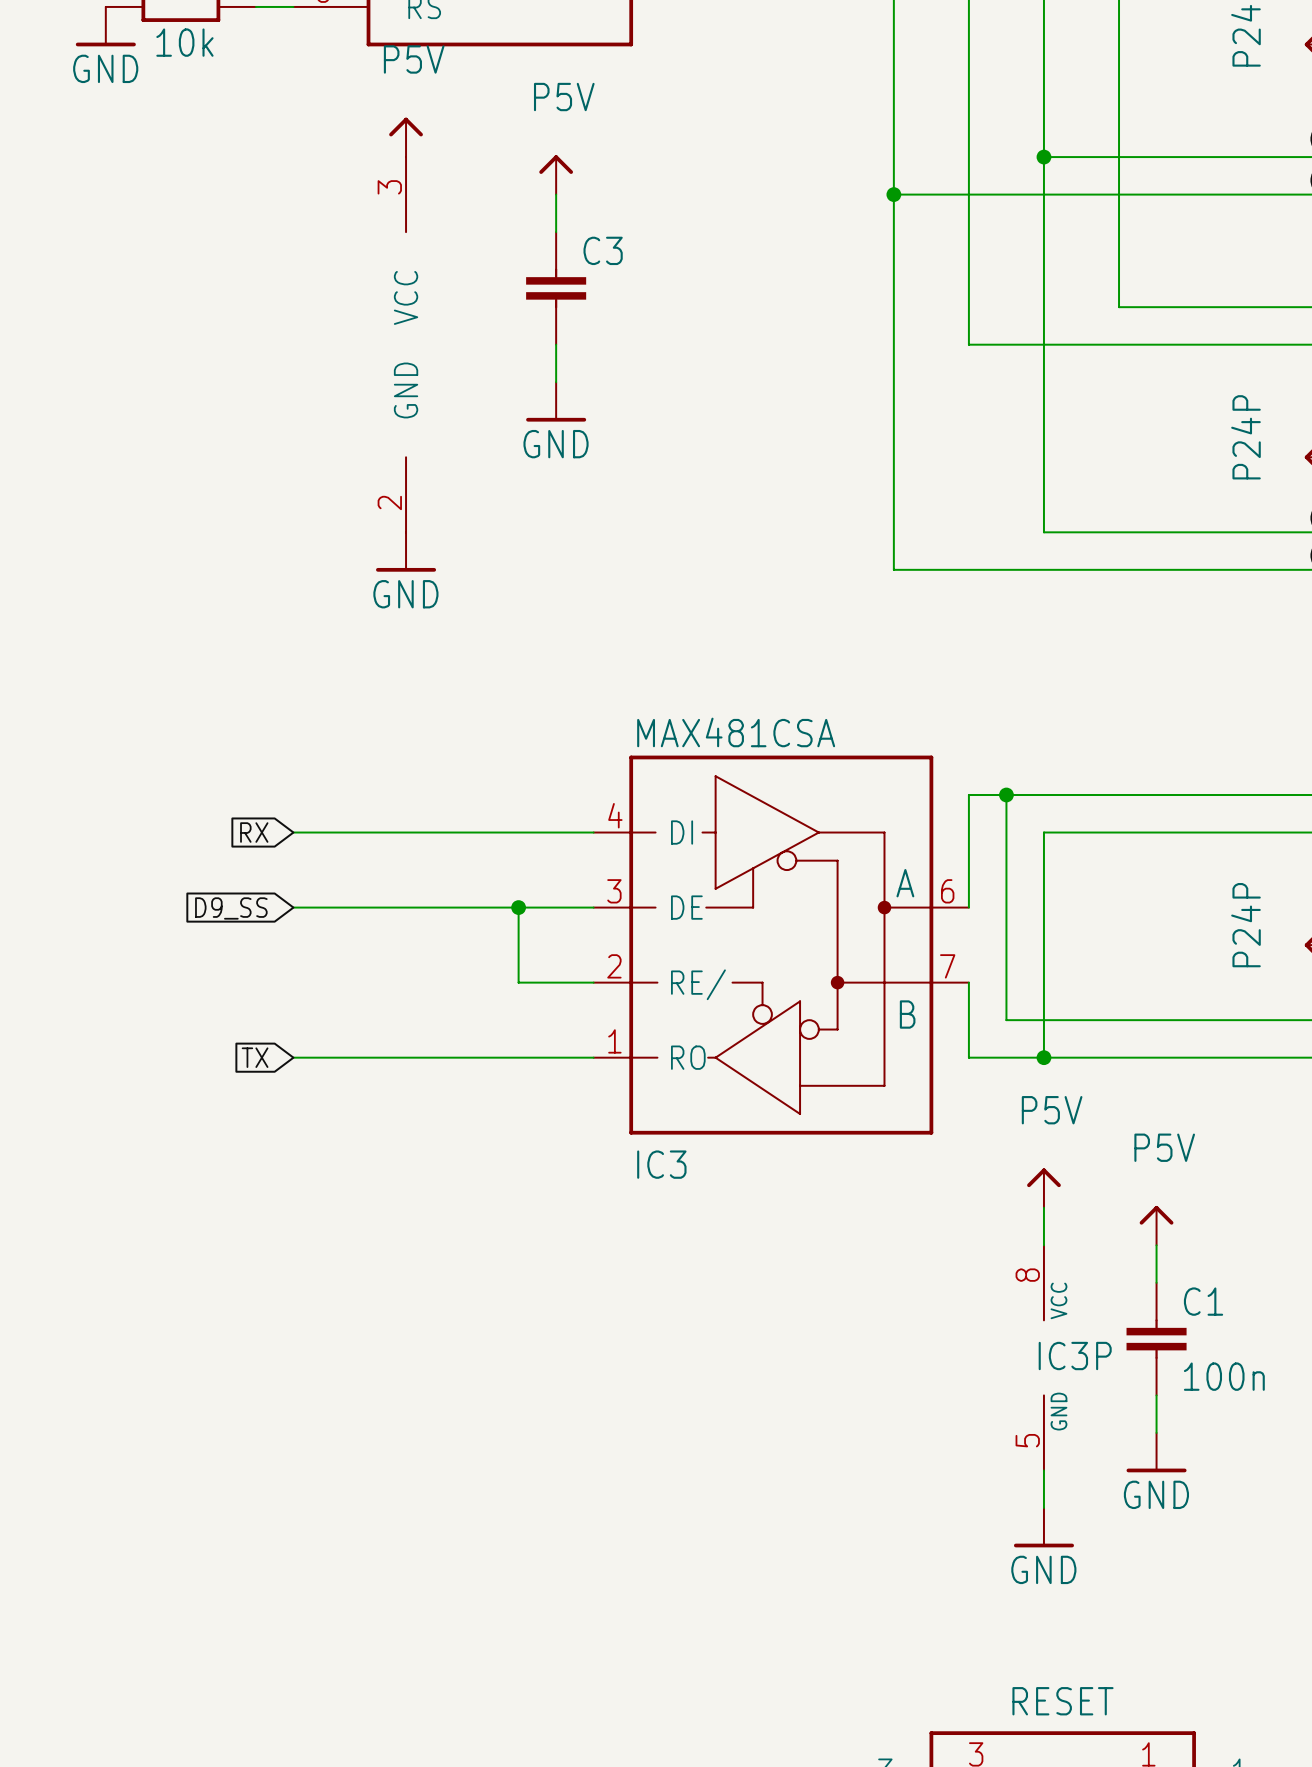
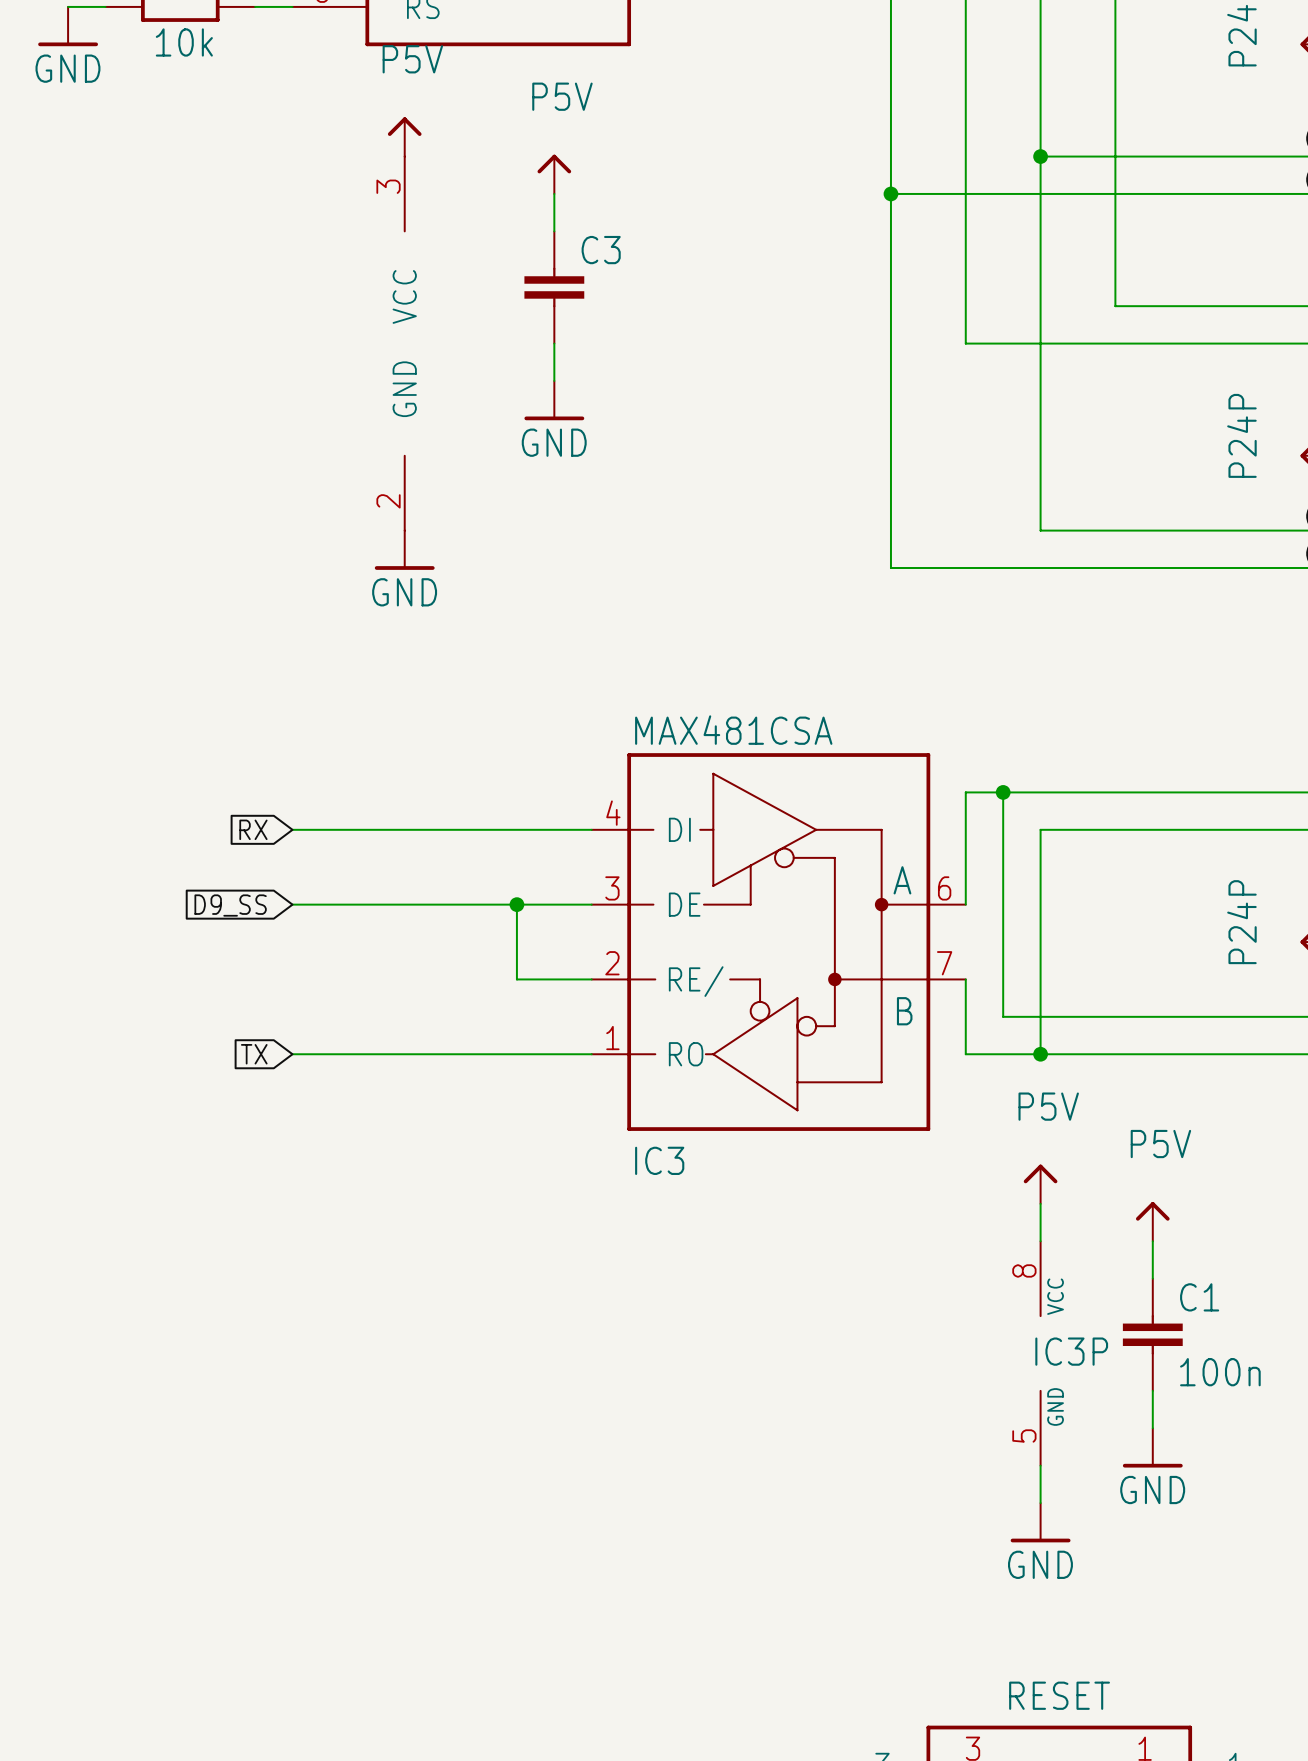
wire: none -> (68, 6) (105, 6)
power symbol position: GND (105, 26) -> GND (68, 26)

